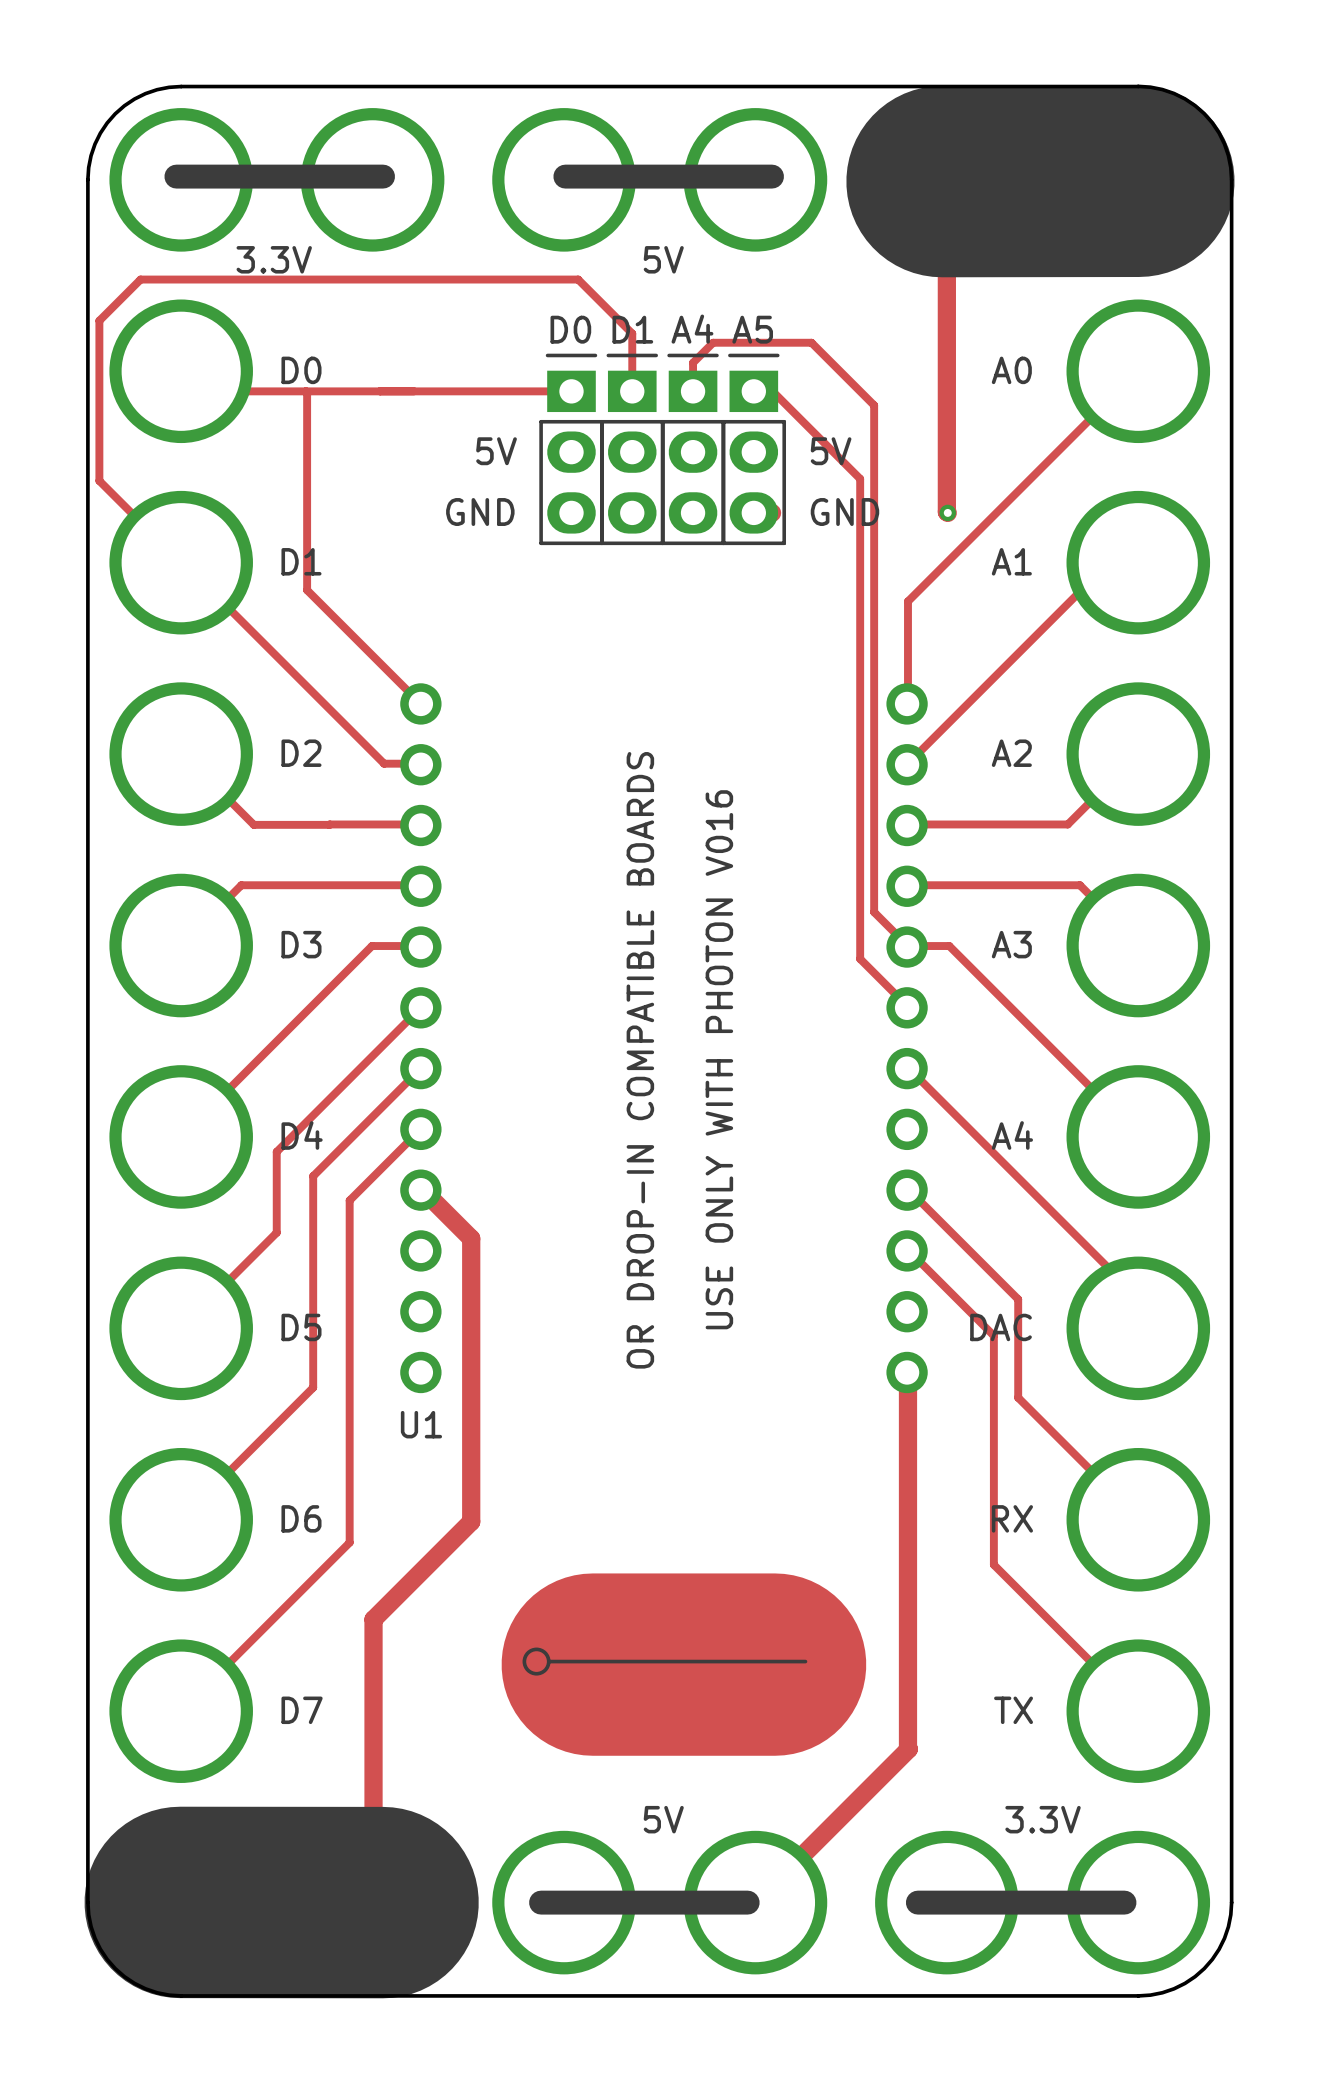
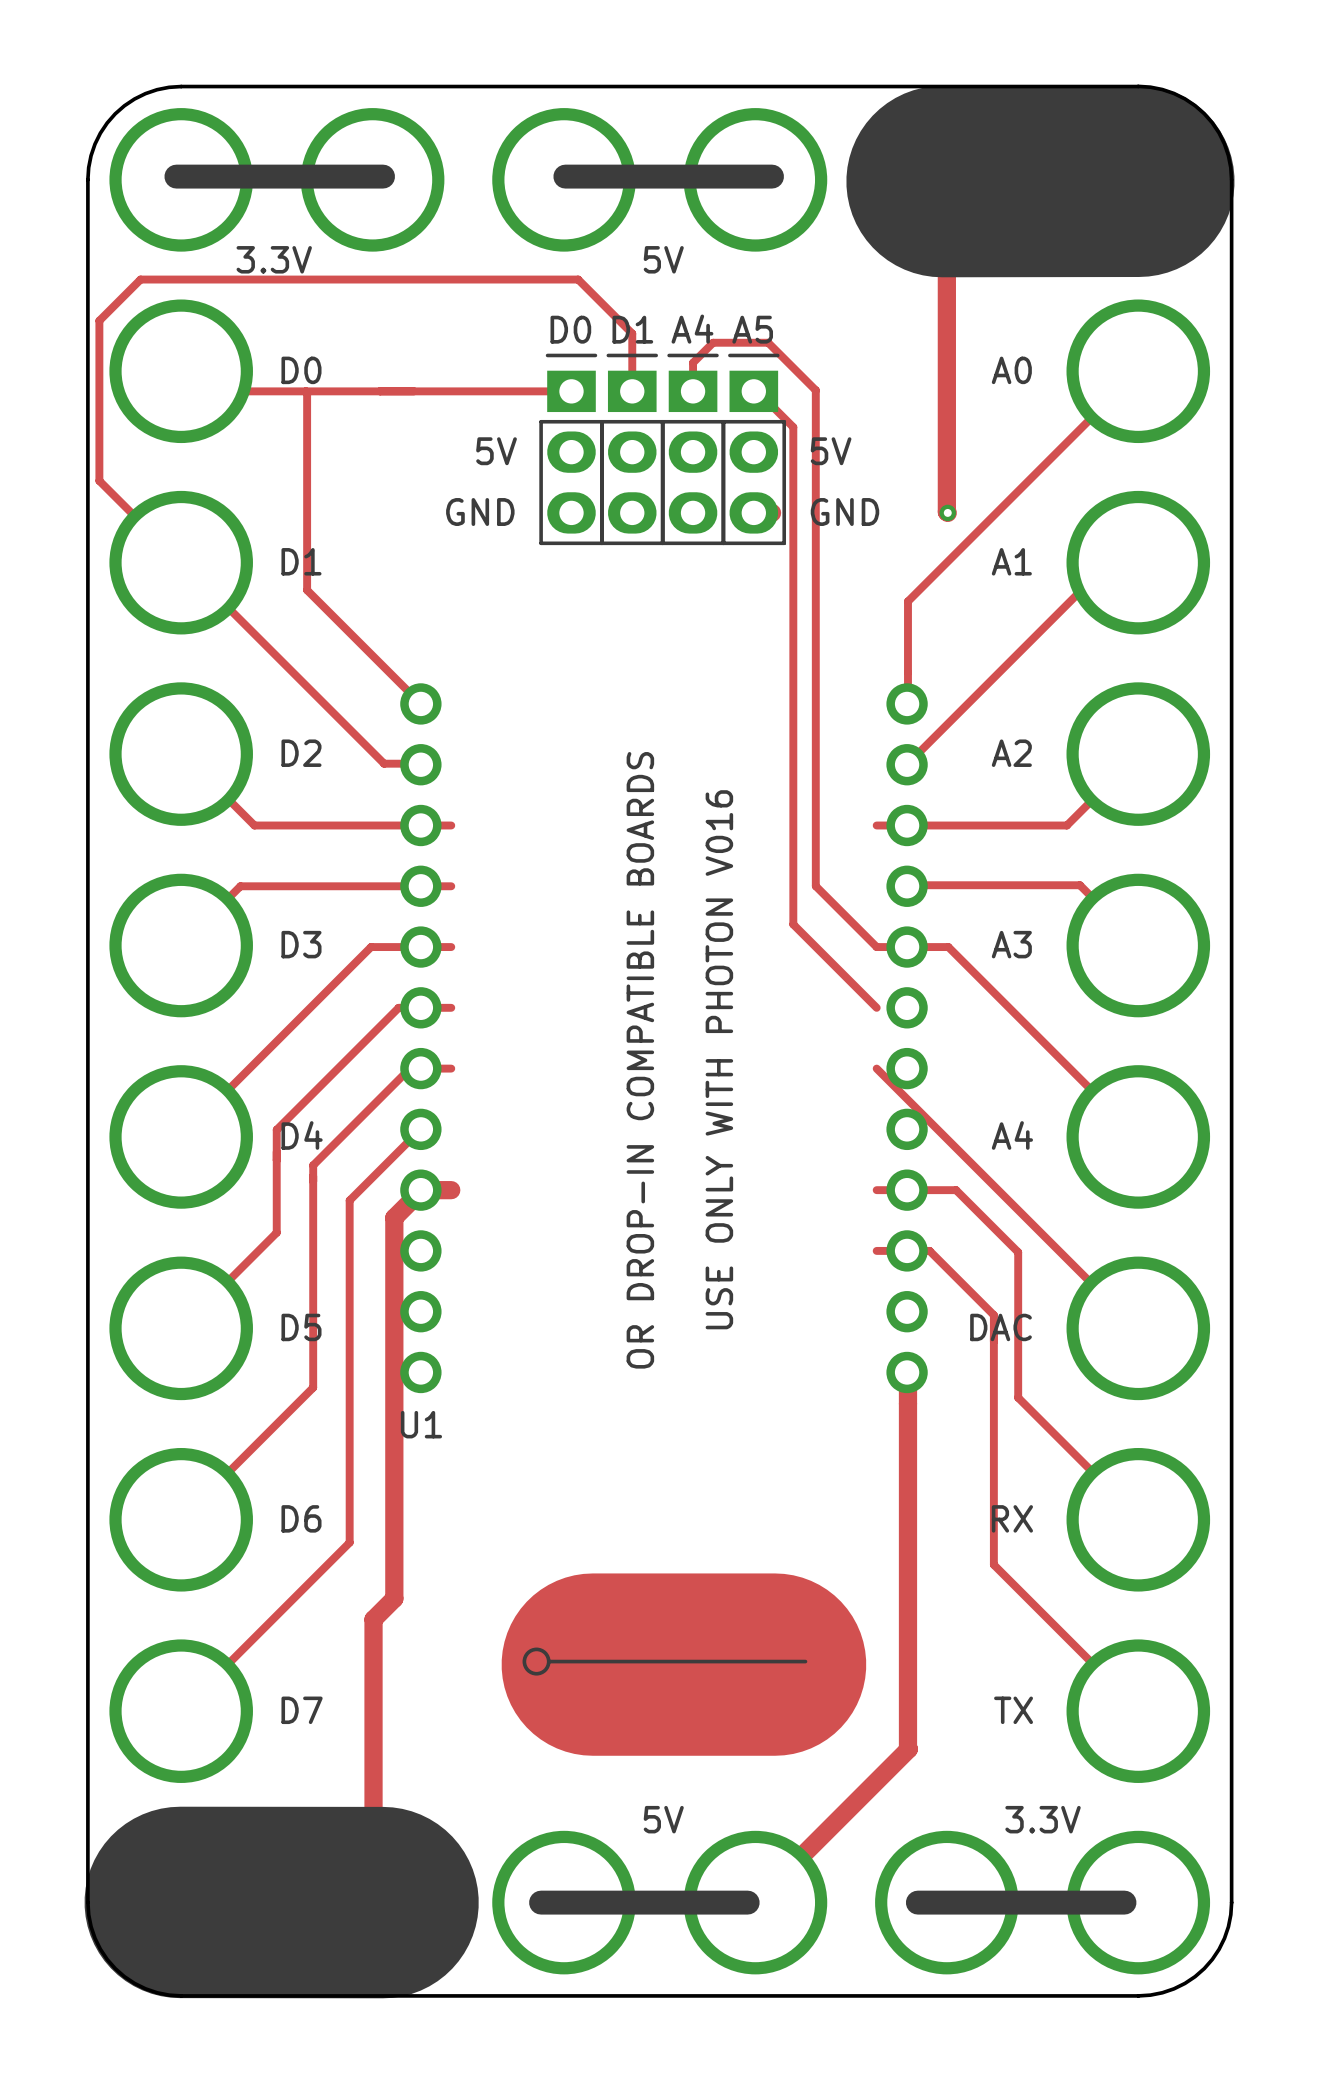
track: (768, 342) (811, 342) (874, 405) (874, 912) (907, 946) (949, 946) (1139, 1135) -> (768, 342) (815, 390) (815, 886) (876, 947) (948, 947) (1138, 1136)
track: none -> (753, 391) (757, 391) (793, 427) (793, 924) (876, 1007)
track: (772, 391) (860, 478) (860, 958) (907, 1006) -> none
track: (421, 824) (253, 824) -> (451, 825) (253, 824)
track: (907, 824) (1067, 824) -> (876, 825) (1067, 824)
track: (421, 885) (240, 886) -> (451, 886) (240, 886)
track: (421, 946) (371, 947) -> (451, 947) (371, 947)
track: (421, 1006) (276, 1151) -> (451, 1007) (398, 1007) (276, 1129) (276, 1151)
track: (421, 1067) (313, 1176) -> (451, 1068) (409, 1068) (313, 1165) (313, 1176)
track: (907, 1067) (1139, 1298) -> none
track: none -> (876, 1068) (1138, 1328)
track: (421, 1189) (471, 1238) (471, 1521) (394, 1598) -> (451, 1190) (422, 1190) (394, 1217) (394, 1598)
track: (907, 1189) (1018, 1299) -> (876, 1190) (956, 1190) (1018, 1252) (1018, 1299)
track: (907, 1249) (993, 1335) -> (876, 1250) (929, 1250) (993, 1315) (993, 1335)

